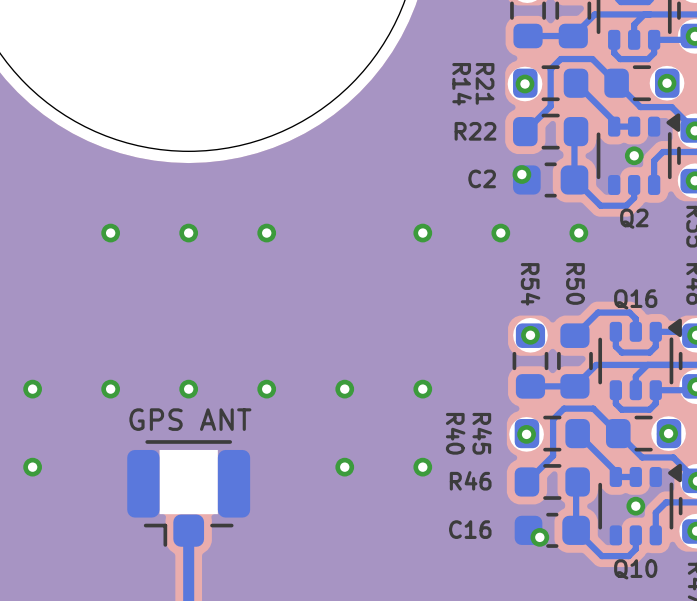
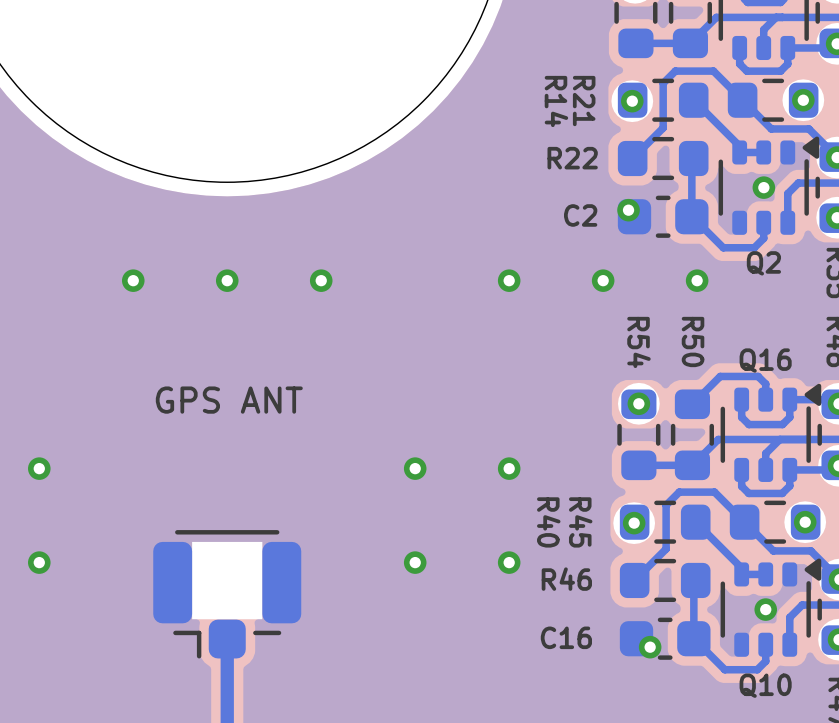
via: (110, 389) -> none
via: (188, 389) -> none
via: (266, 389) -> none
text position: GPS ANT (190, 419) -> GPS ANT (229, 400)

